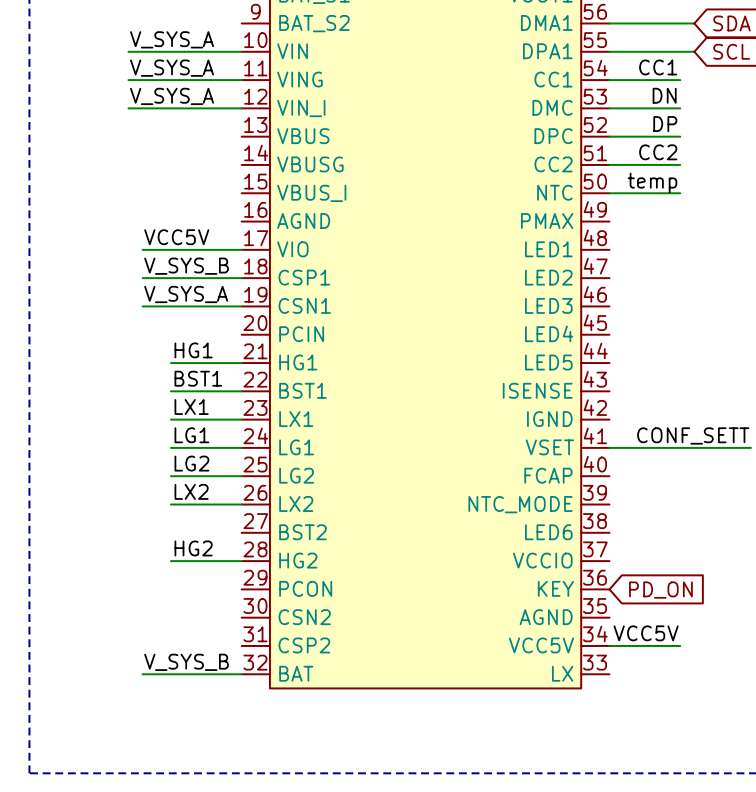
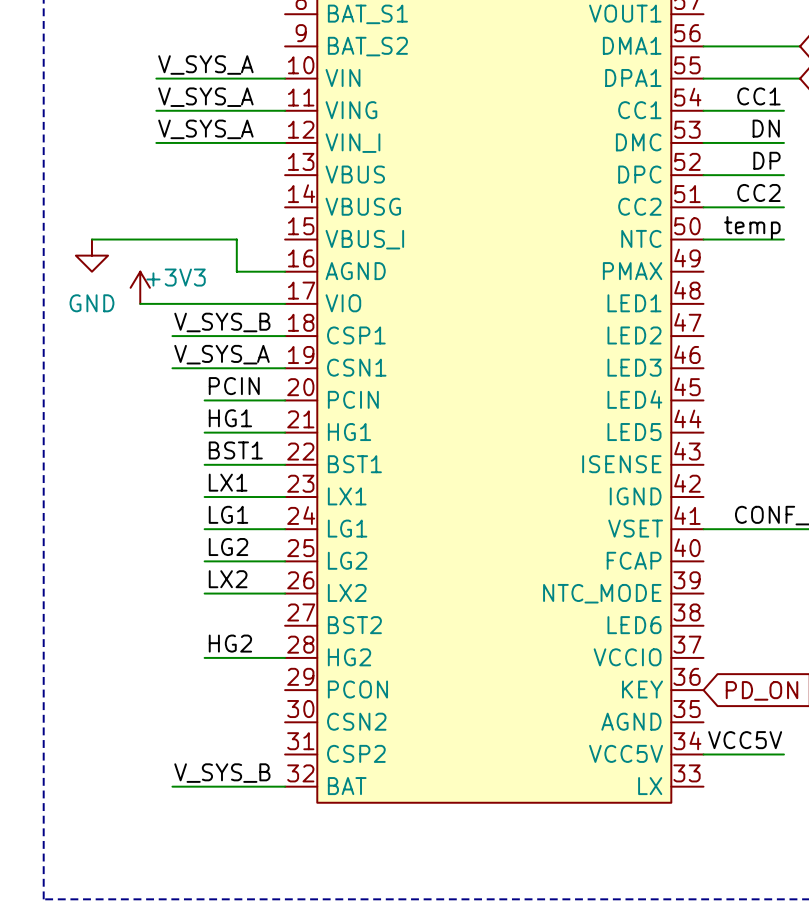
wire: none -> (91, 239) (236, 239) (236, 271) (285, 271)
power symbol: none -> GND (91, 255)
power symbol: none -> +3V3 (140, 287)
label: VCC5V (176, 237) -> none
wire: none -> (140, 303) (172, 303)
label: none -> PCIN (234, 386)
wire: none -> (204, 400) (285, 400)

